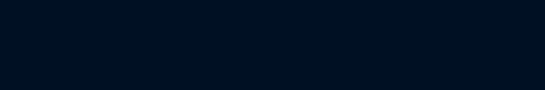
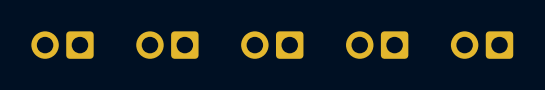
part: none -> (62, 45)
part: none -> (167, 45)
part: none -> (272, 45)
part: none -> (377, 45)
part: none -> (482, 45)

